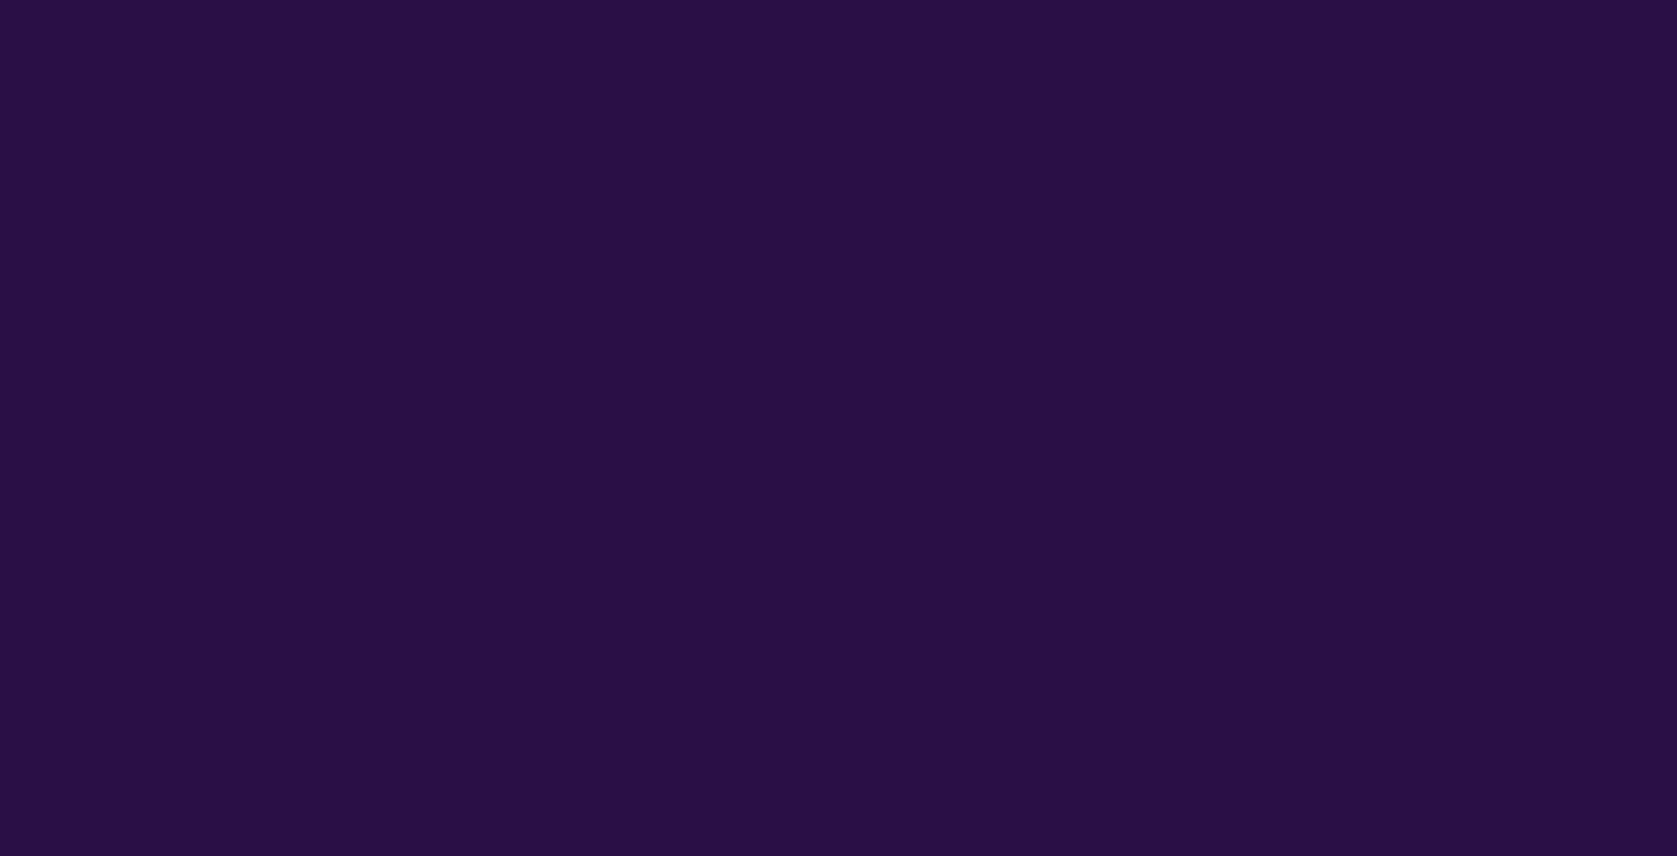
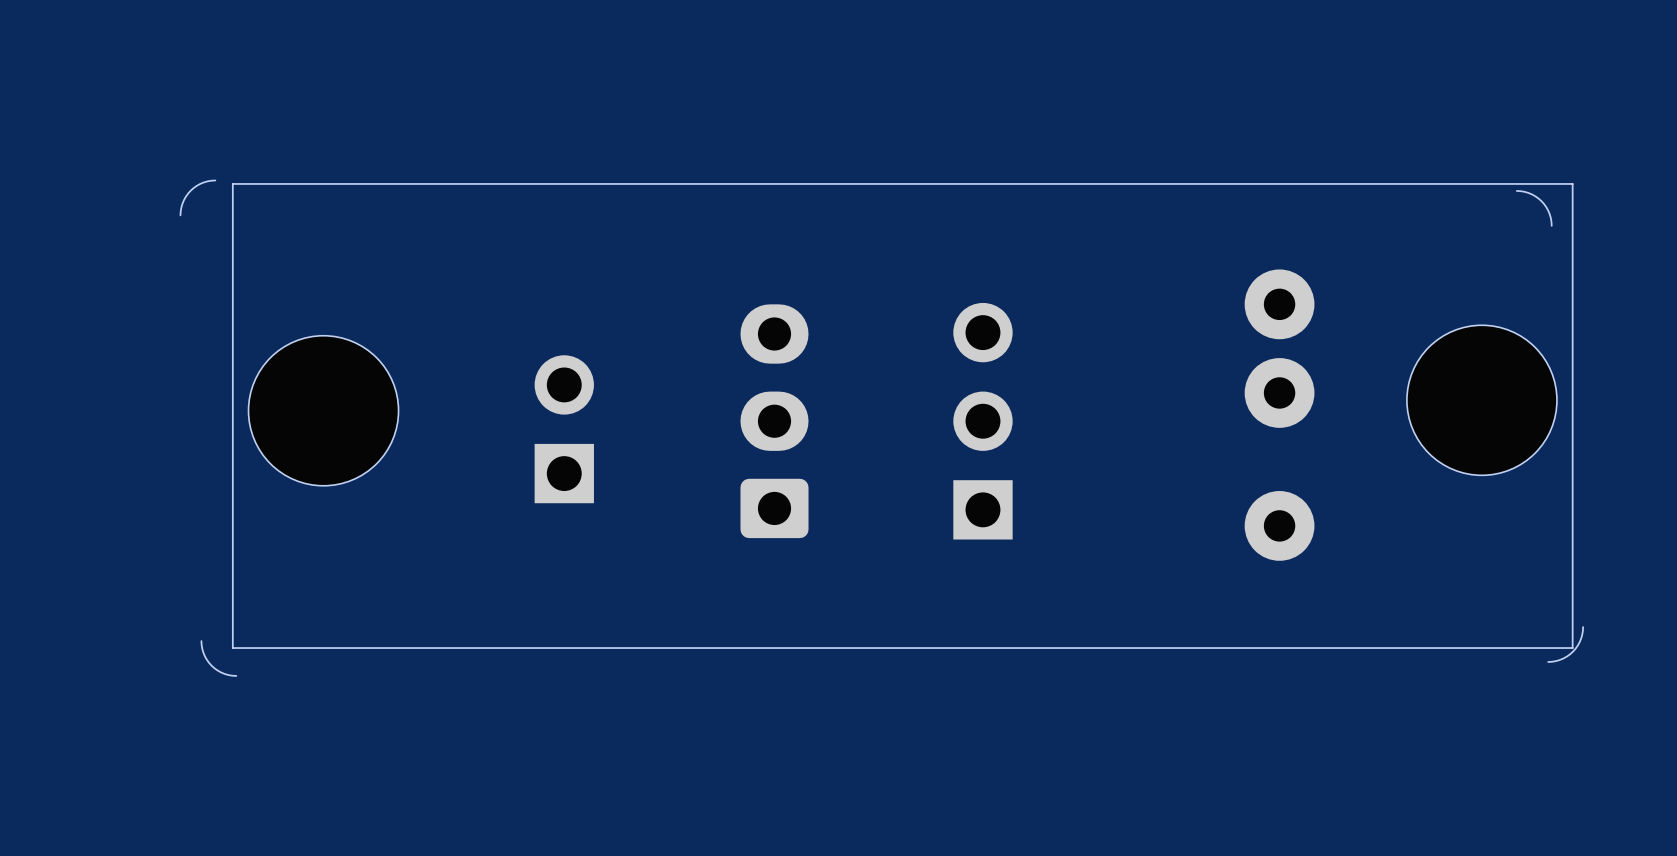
board edge: none -> (215, 180) (203, 182) (190, 190) (182, 203) (180, 215)
board edge: none -> (1572, 183) (232, 183) (232, 648) (1572, 648) (1572, 183)
board edge: none -> (1516, 190) (1528, 192) (1541, 201) (1548, 210) (1551, 225)
part: none -> (1481, 400)
part: none -> (323, 410)
part: none -> (1279, 415)
part: none -> (774, 421)
part: none -> (982, 421)
part: none -> (564, 429)
board edge: none -> (1583, 627) (1581, 638) (1572, 651) (1563, 658) (1548, 661)
board edge: none -> (201, 641) (204, 656) (211, 665) (224, 673) (236, 675)

